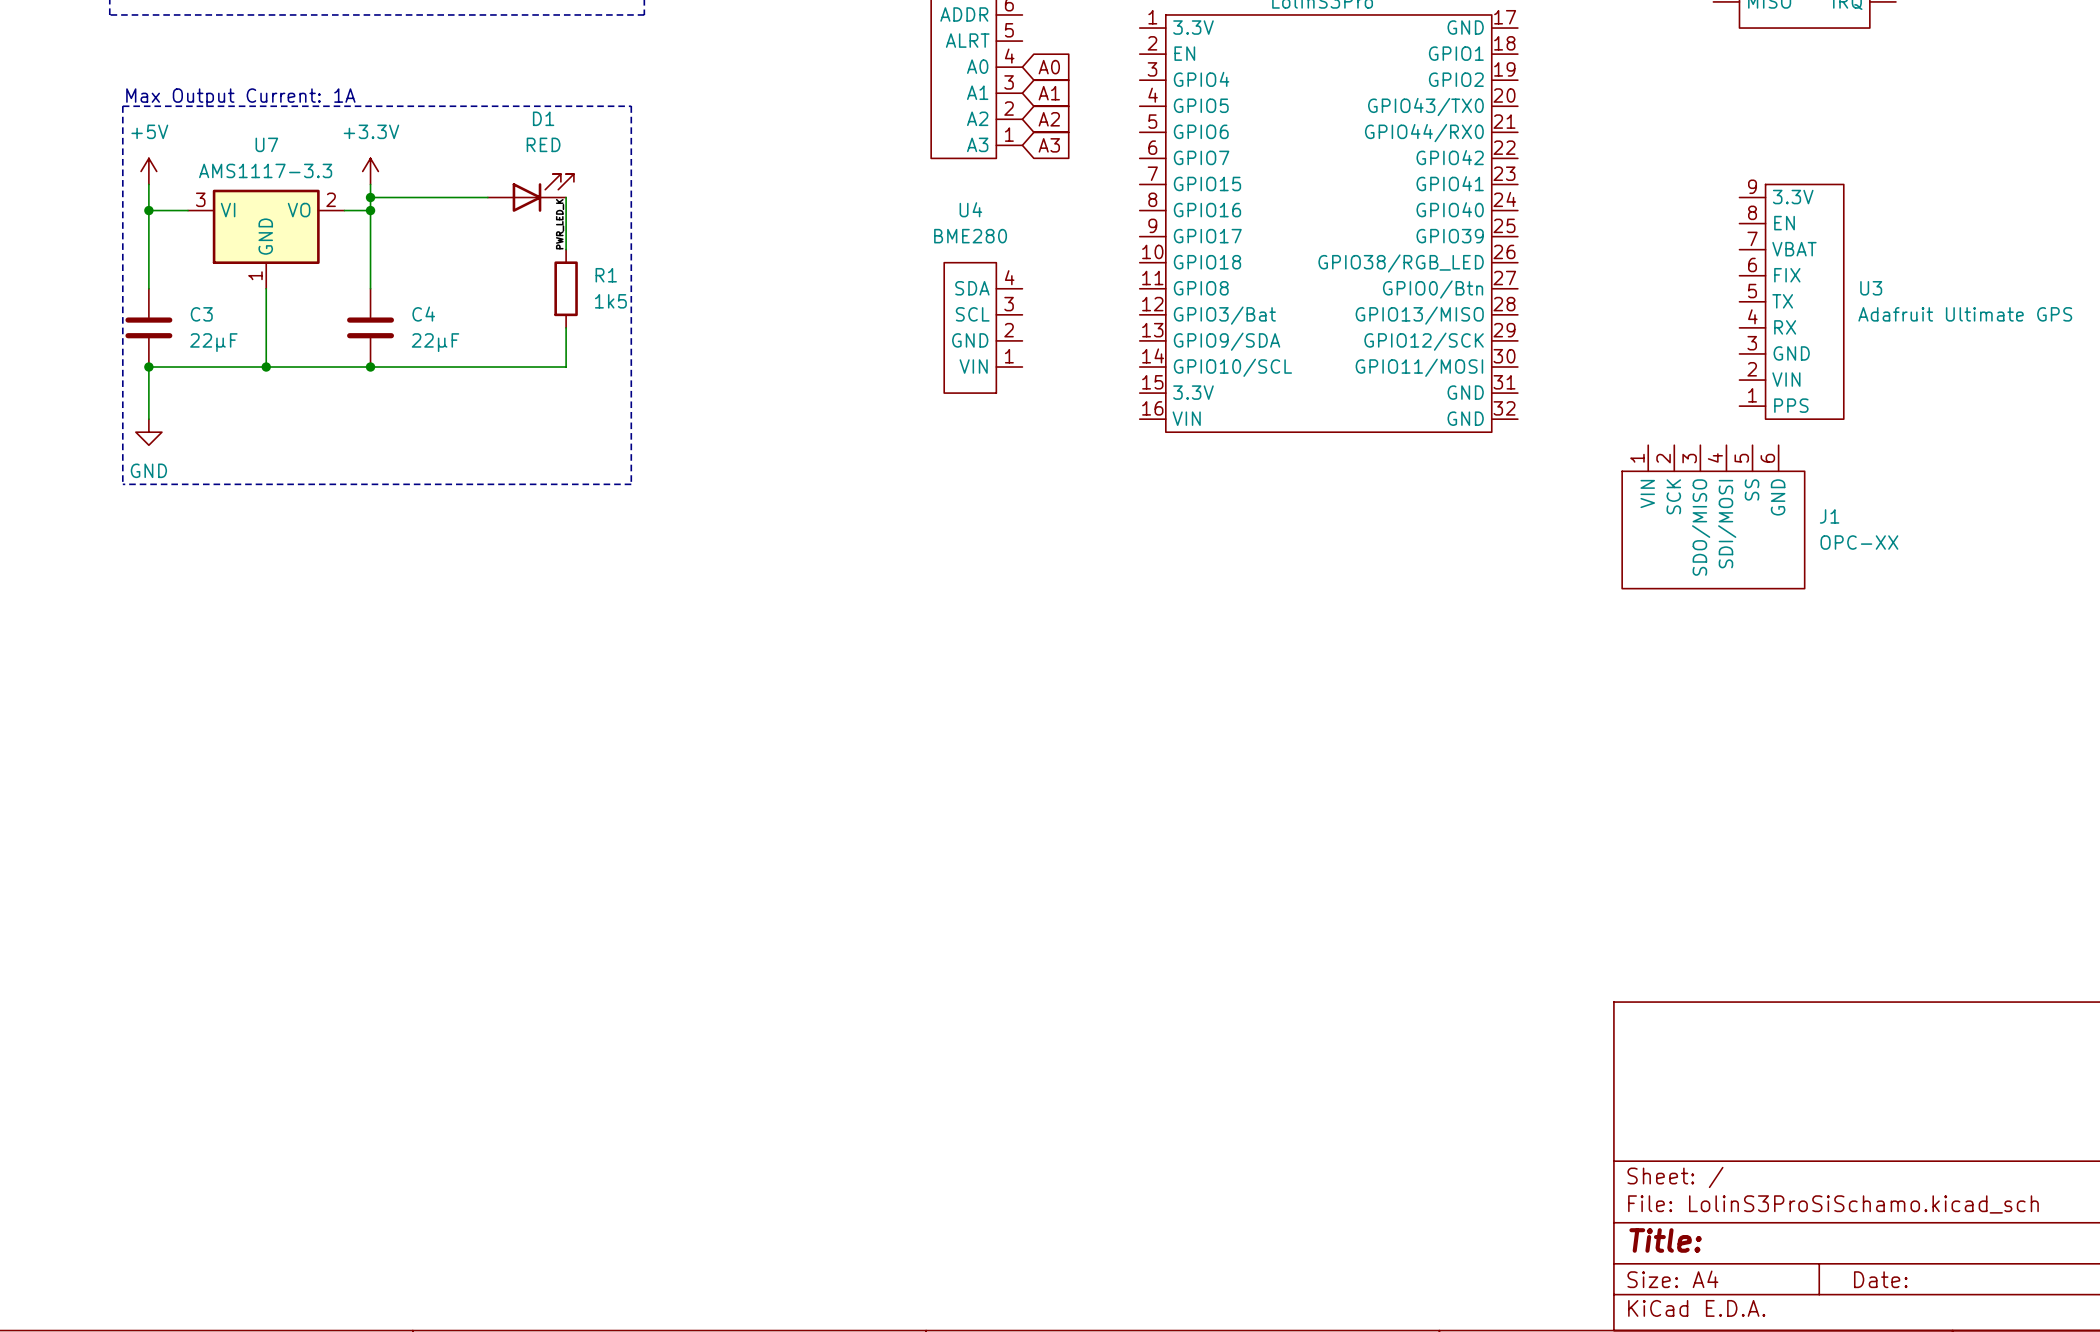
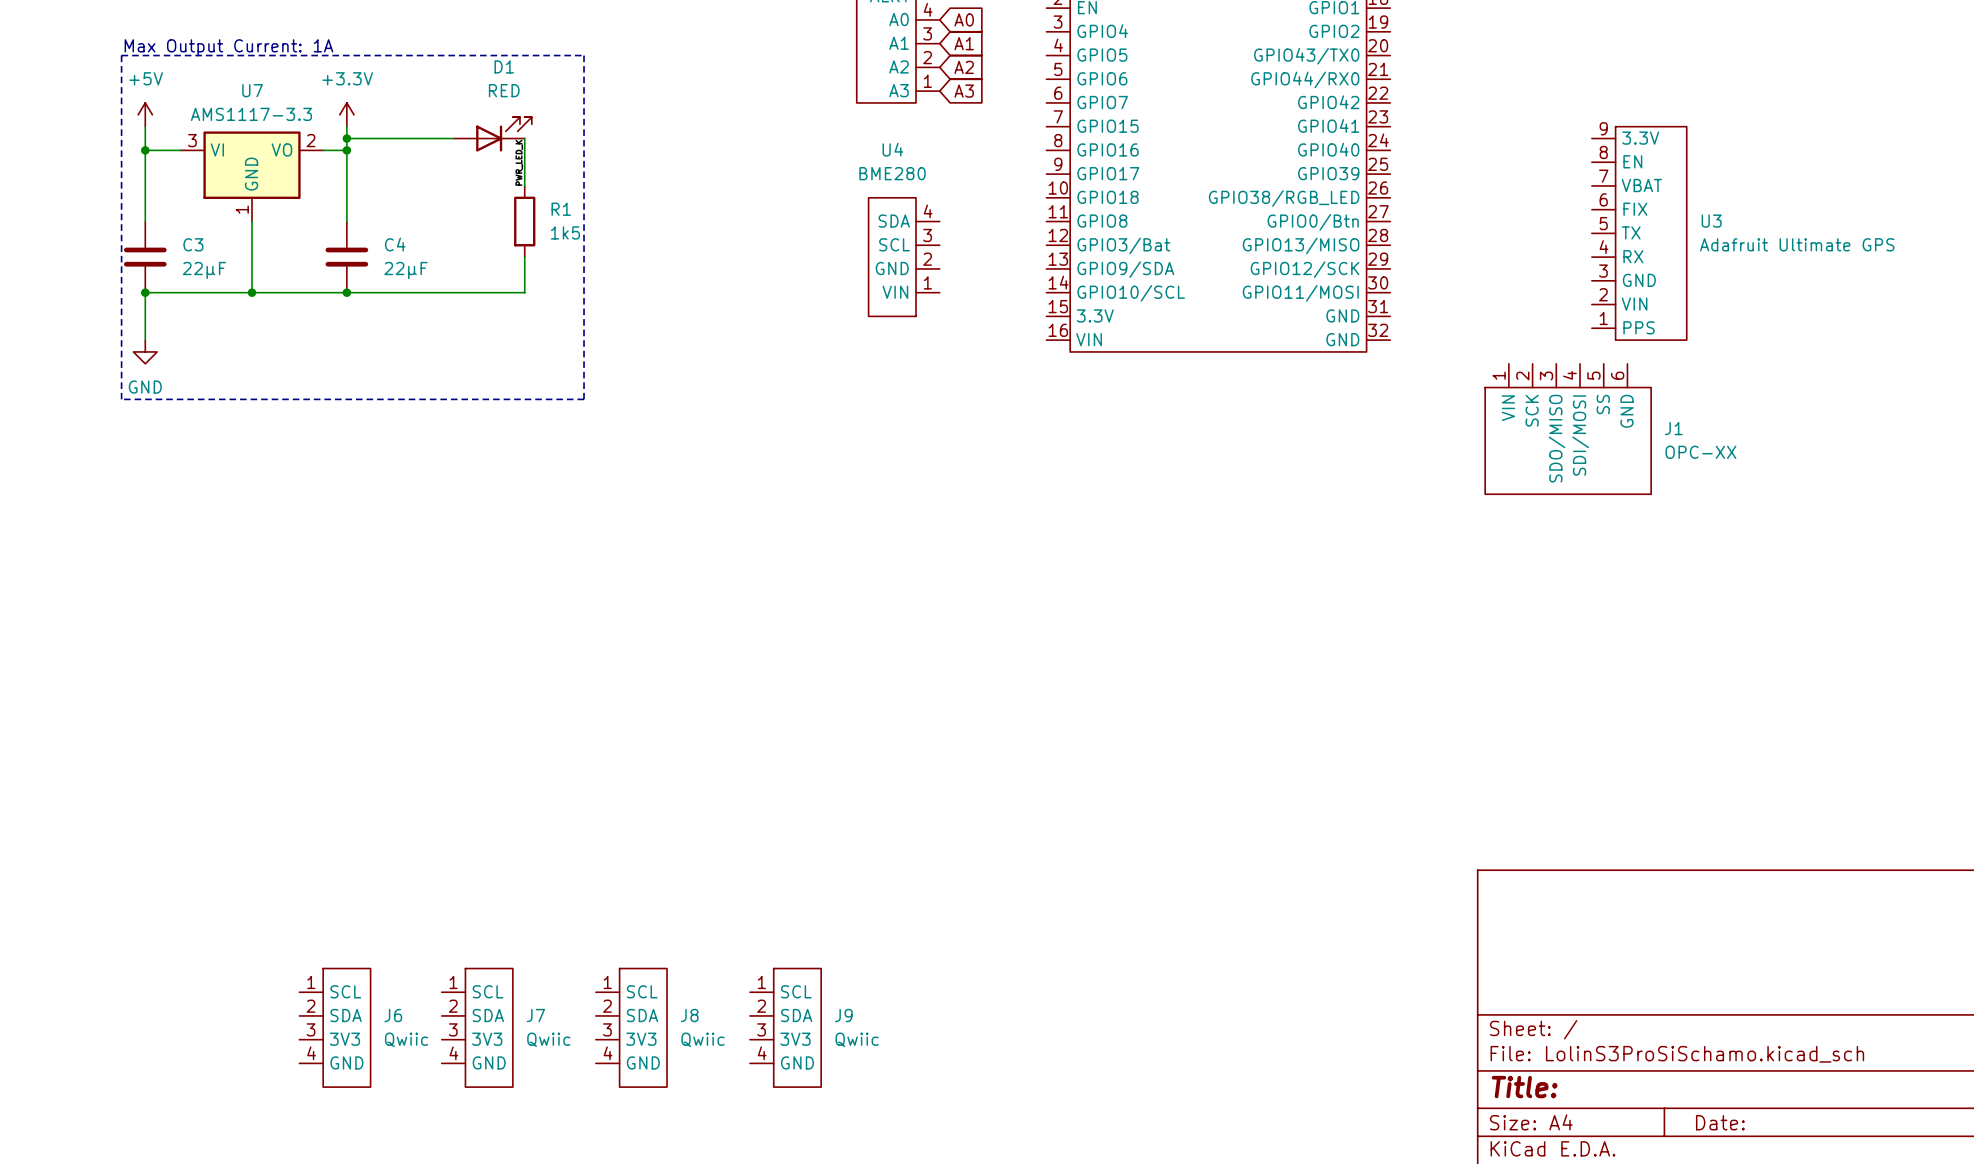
J6: none -> Qwiic (335, 1027)
J7: none -> Qwiic (477, 1027)
J8: none -> Qwiic (631, 1027)
J9: none -> Qwiic (785, 1027)

